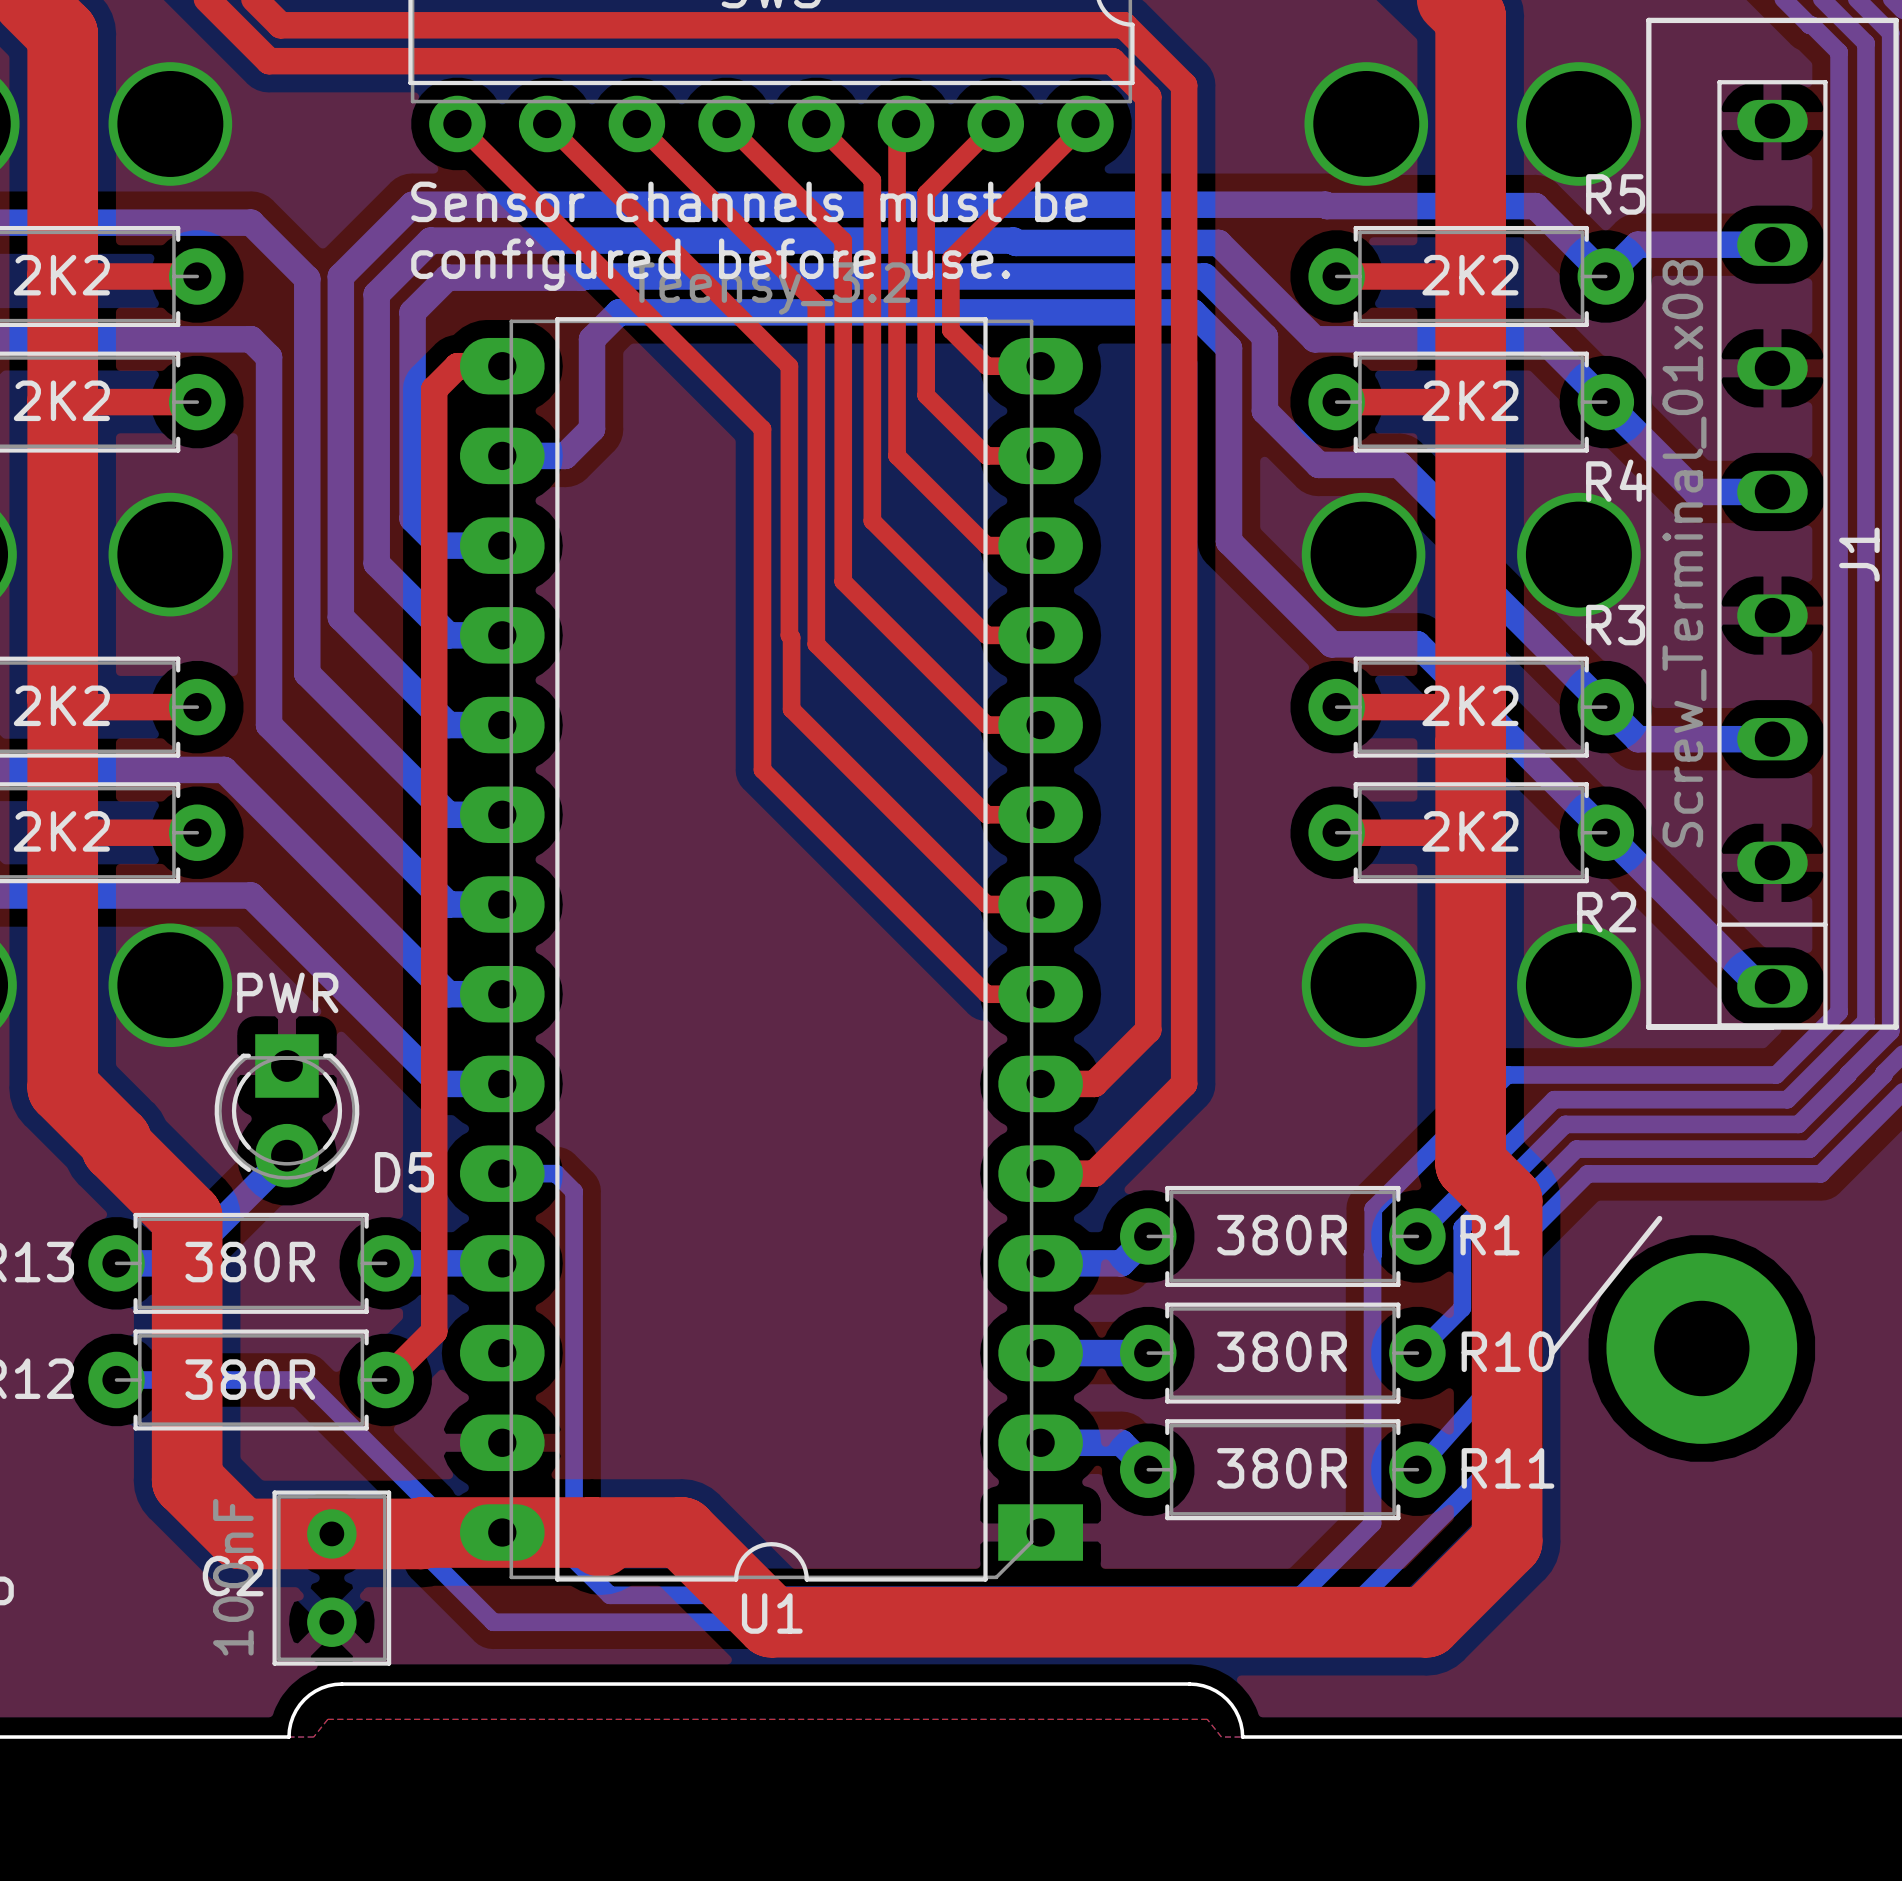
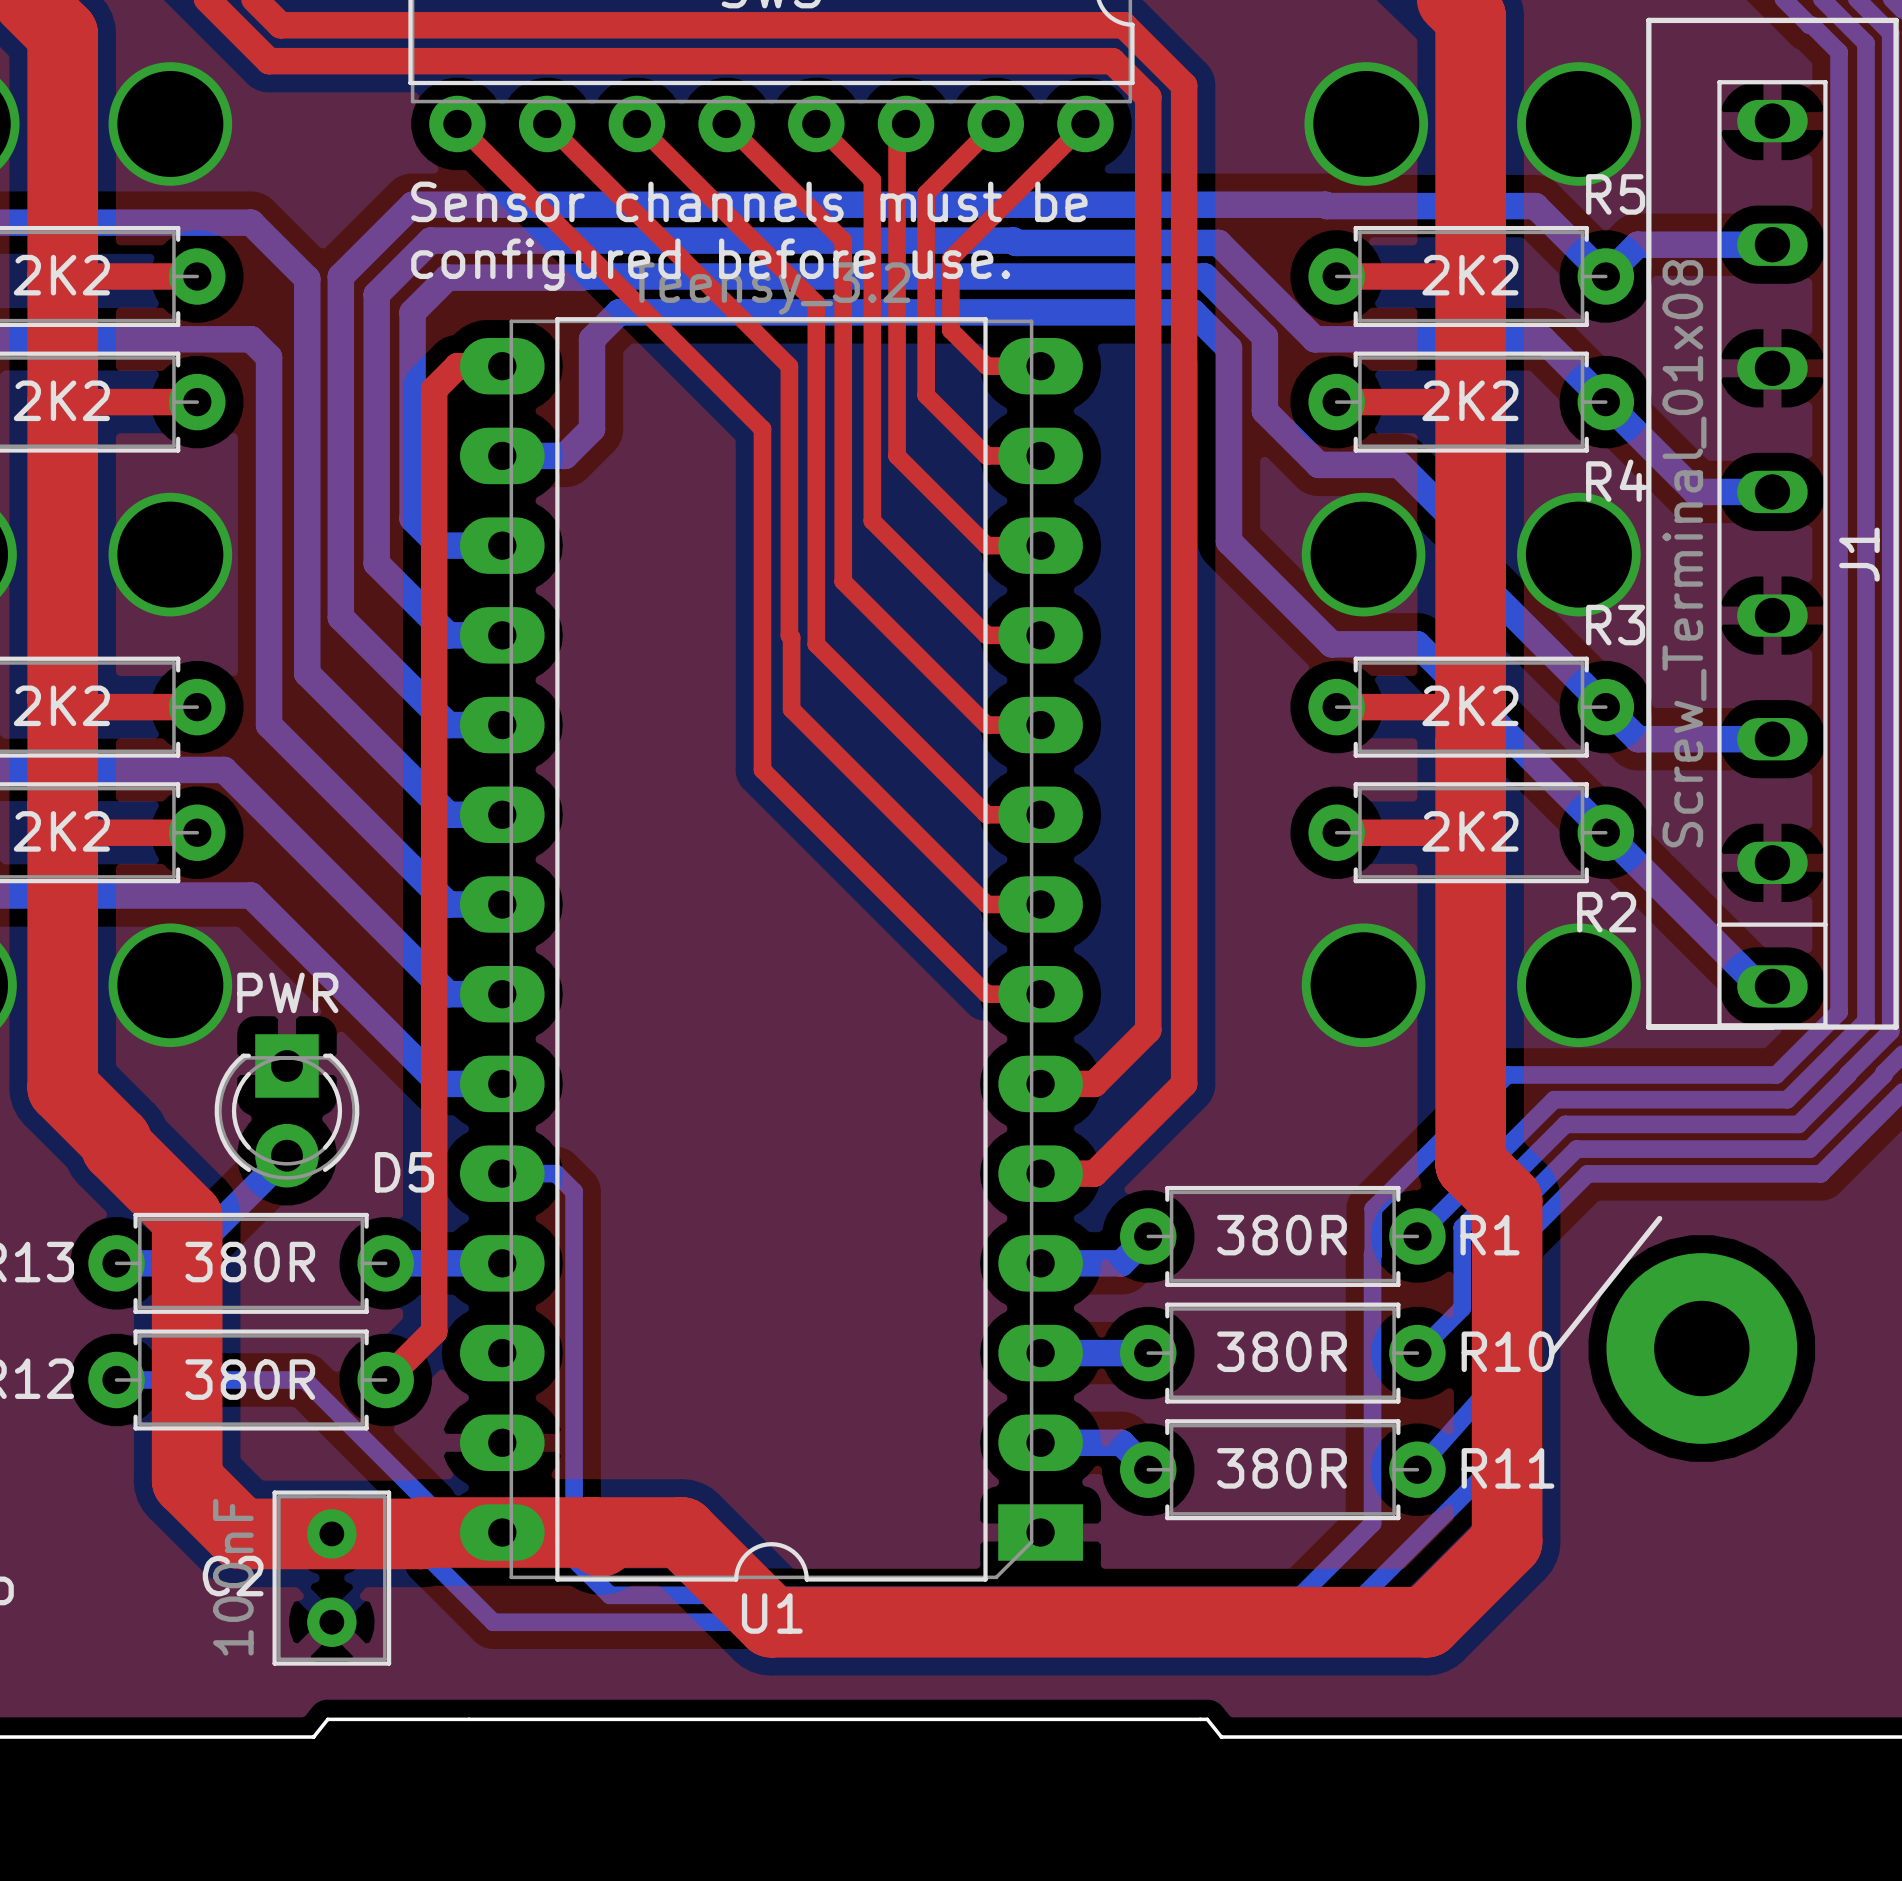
board edge: (288, 1737) (293, 1716) (304, 1699) (321, 1688) (341, 1684) (1189, 1684) (1209, 1688) (1227, 1699) (1238, 1716) (1242, 1737) -> (288, 1737) (313, 1737) (327, 1719) (1207, 1719) (1221, 1737) (1242, 1737)

